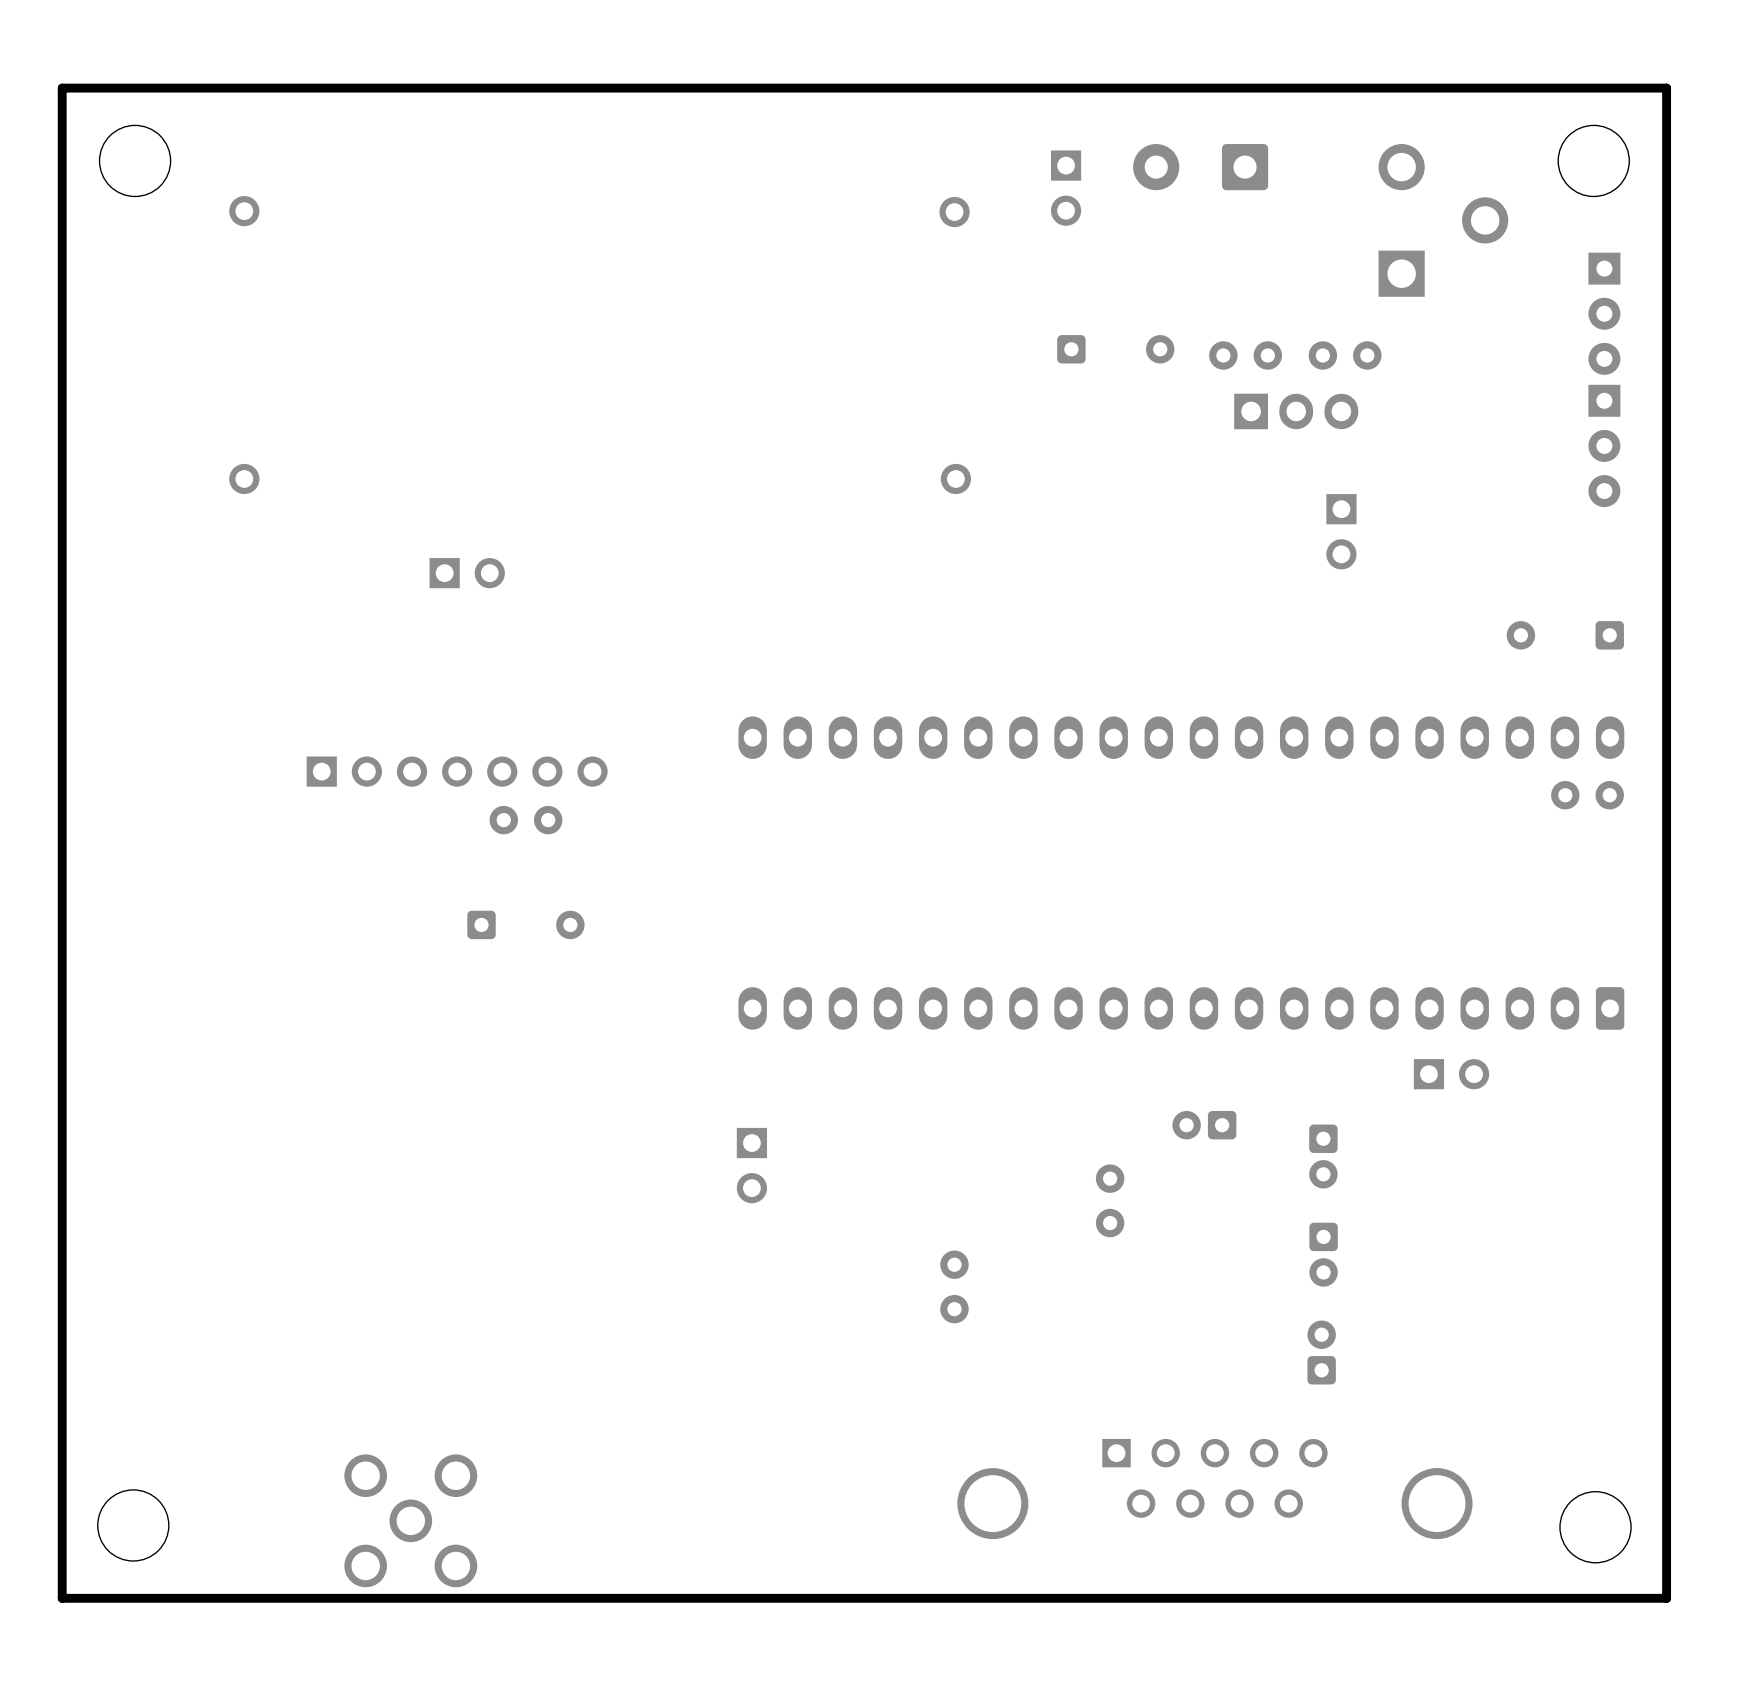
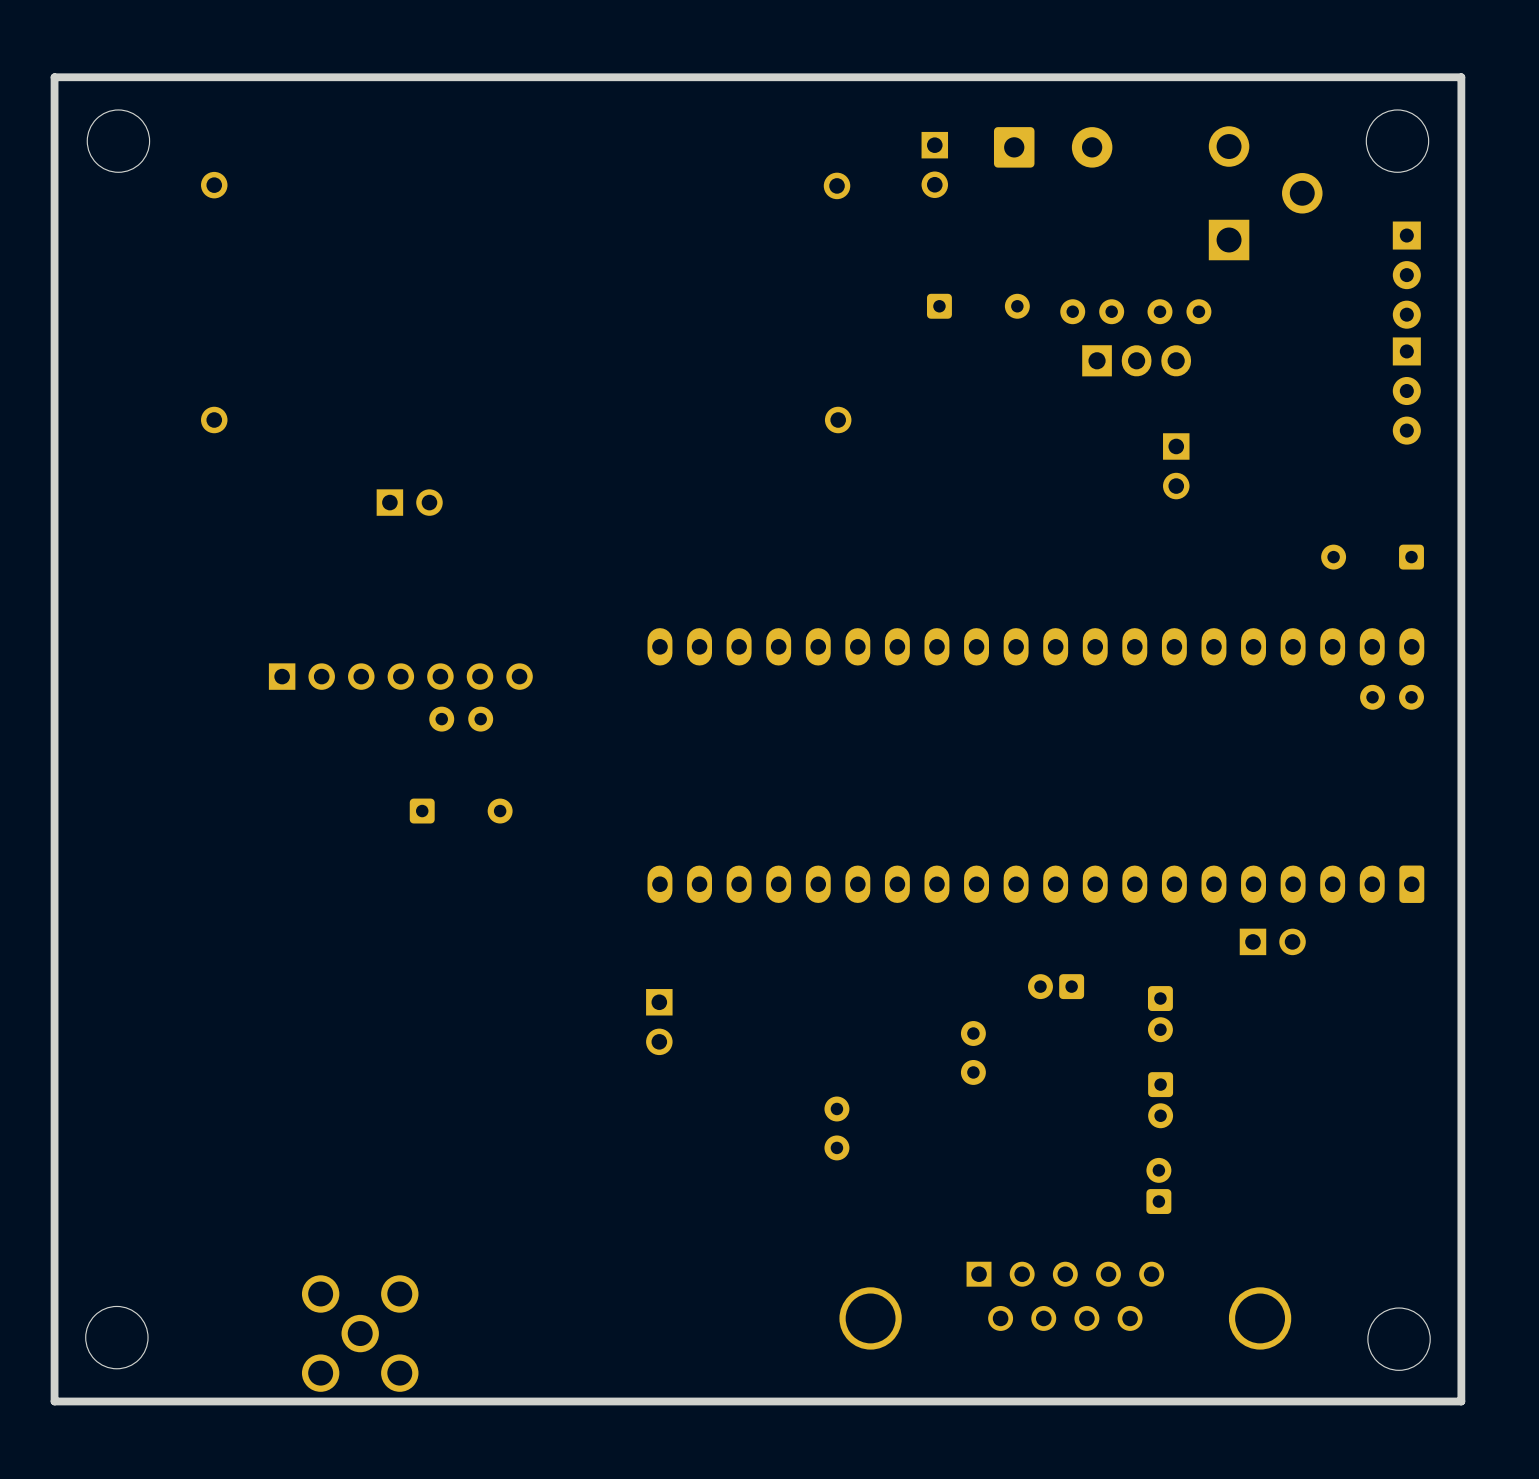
part rotation: 0° (1200, 167) -> 180° (1053, 147)

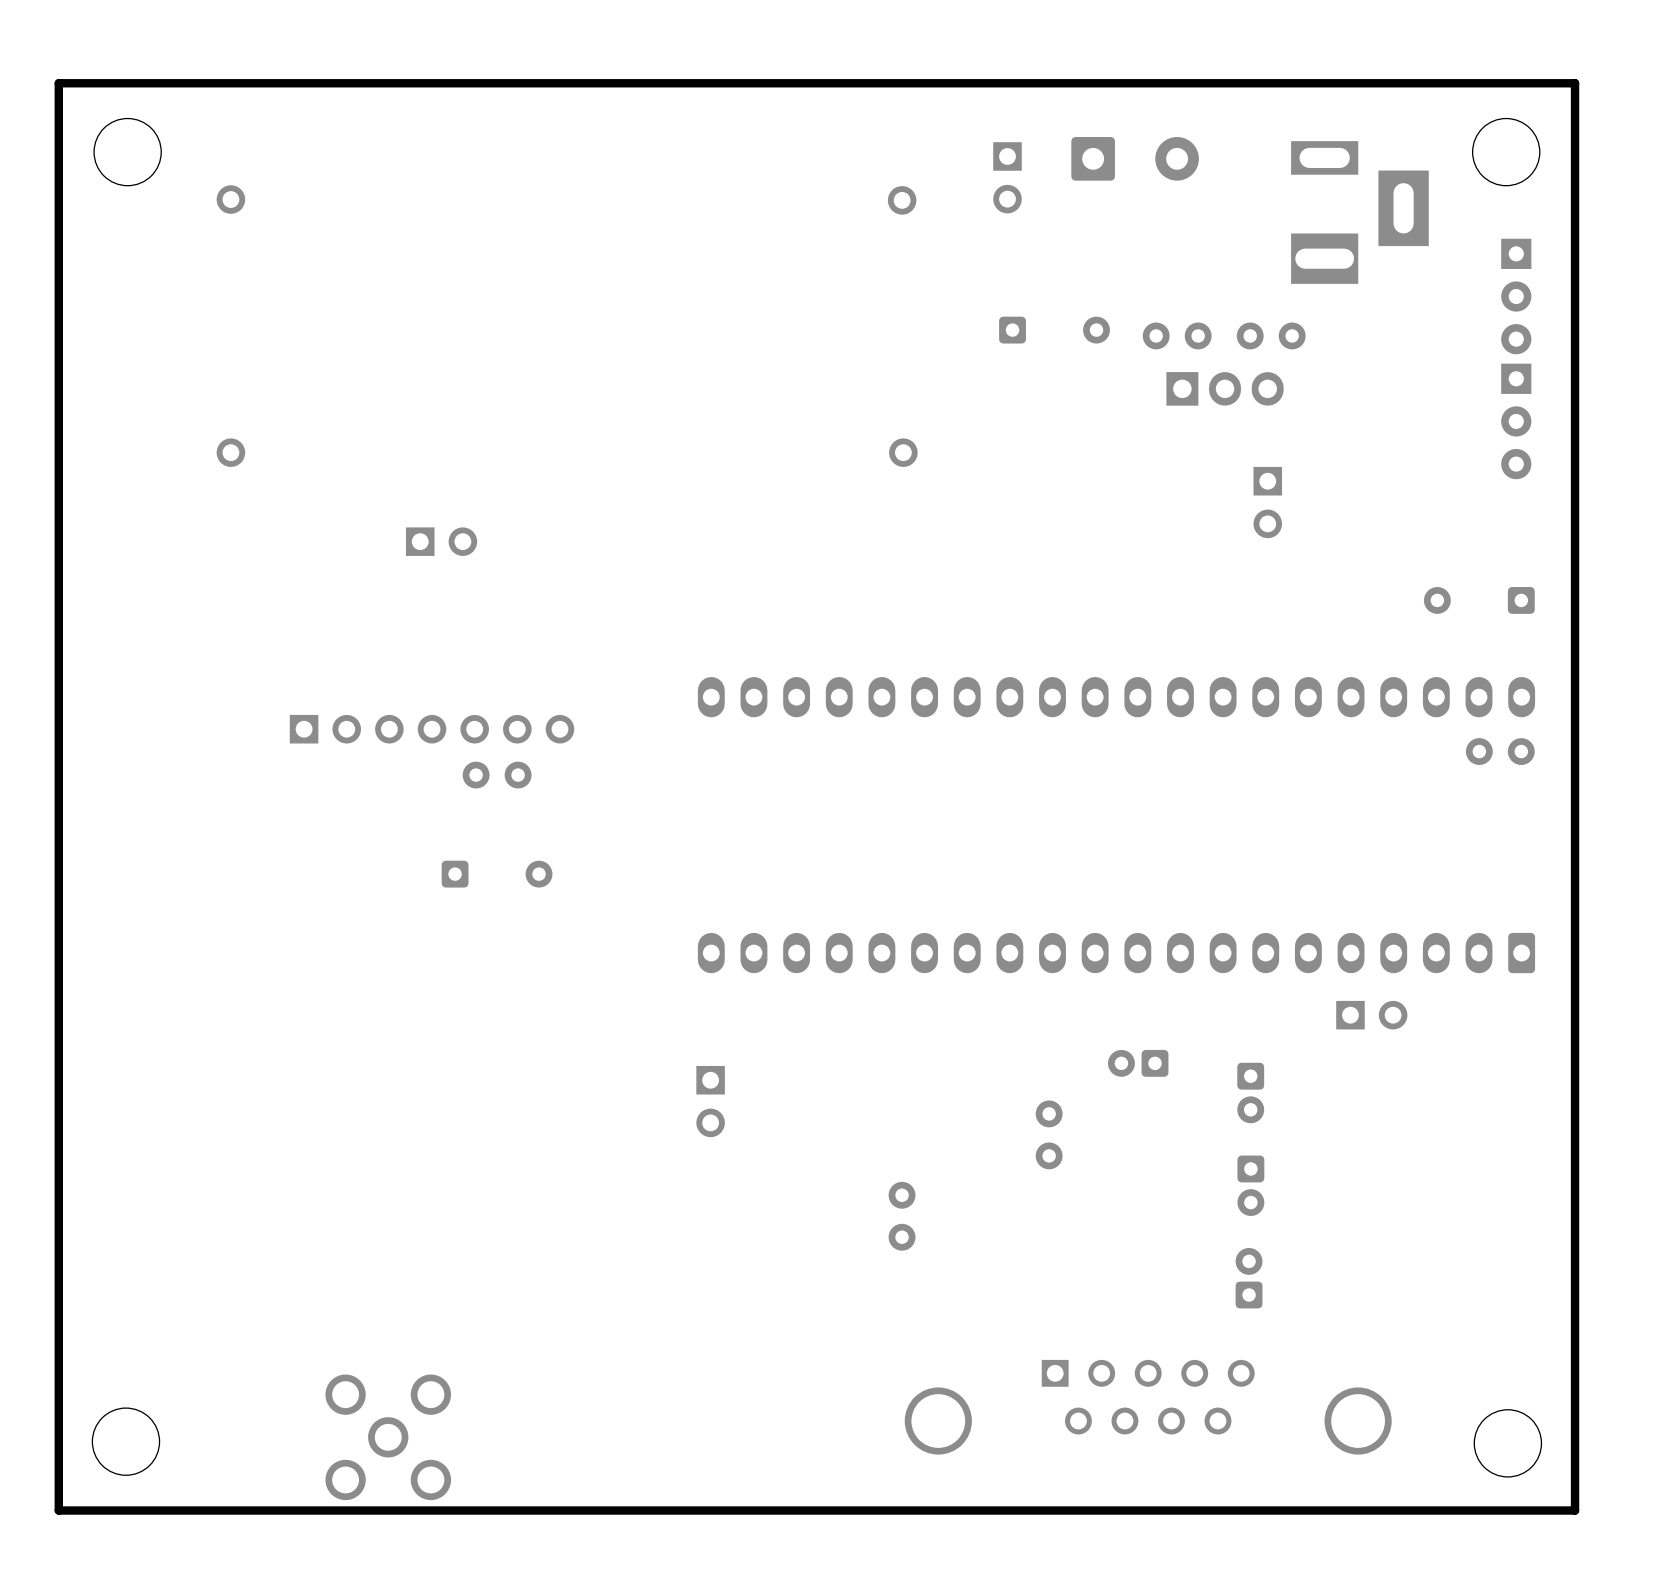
part footprint: [1208, 126, 1323, 261] -> [1291, 141, 1429, 284]

